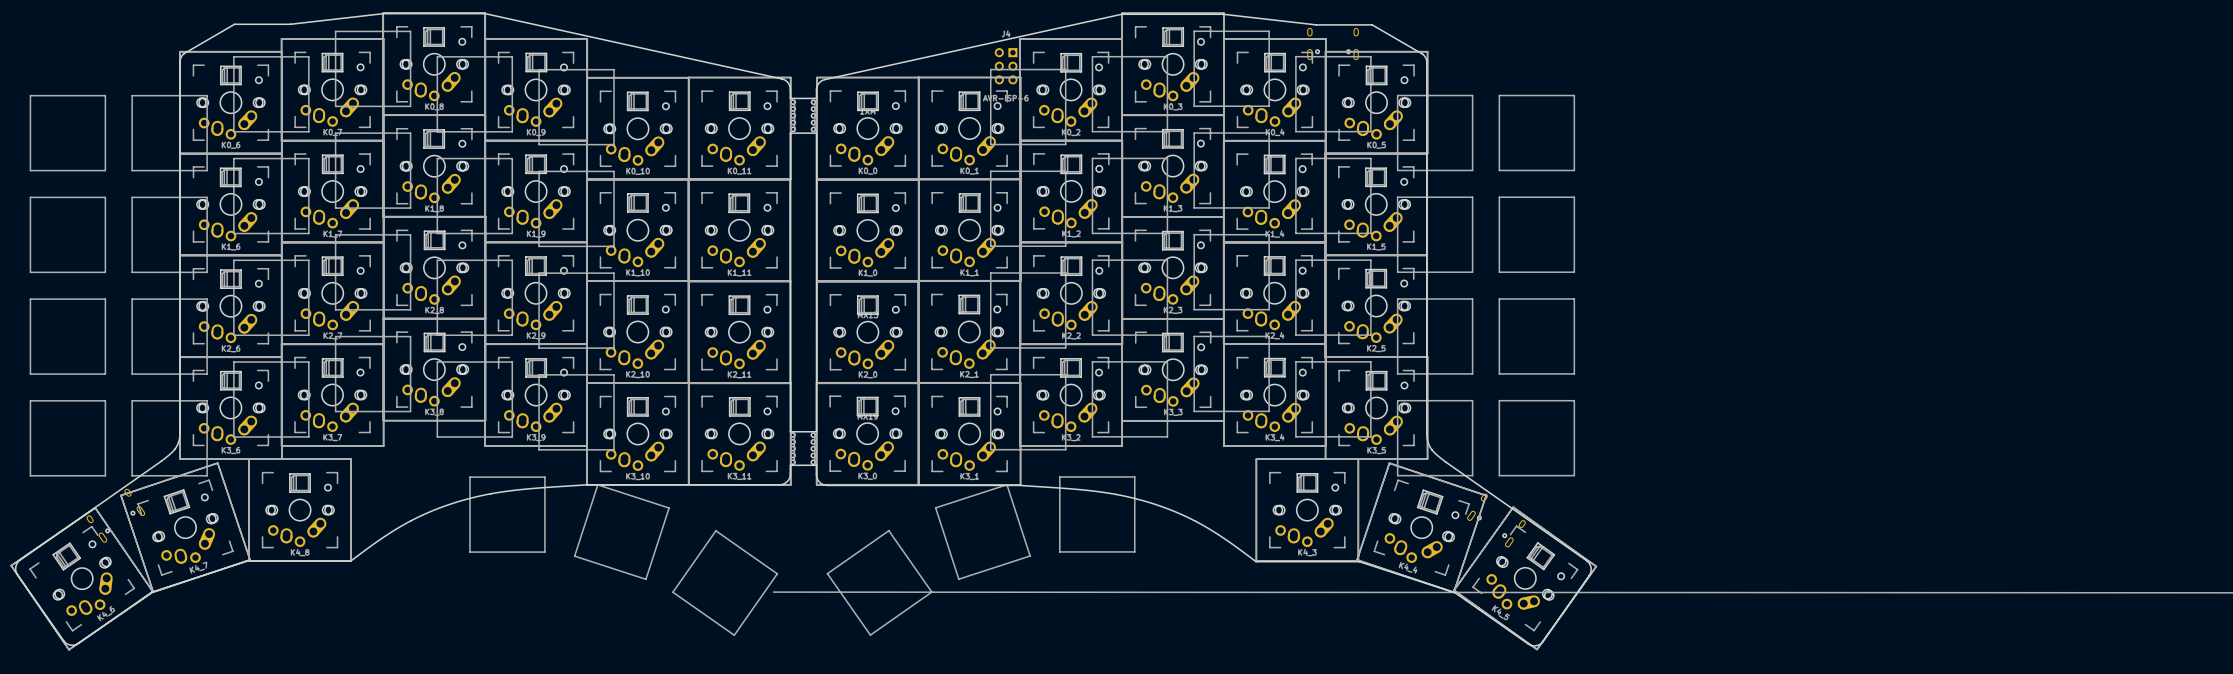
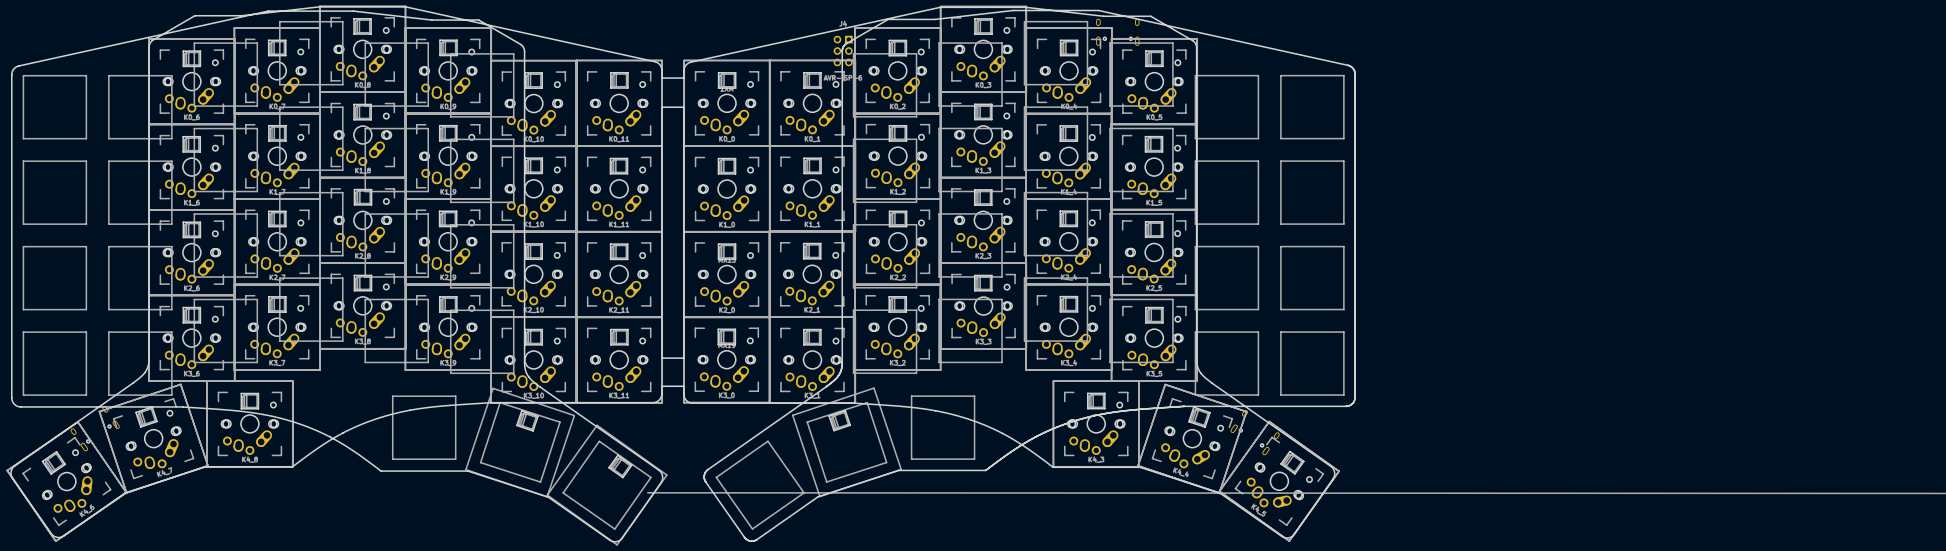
board edge: none -> (268, 11) (353, 11) (431, 20) (478, 20) (523, 46) (525, 368) (529, 377) (540, 387) (661, 472) (661, 482) (619, 540) (610, 540) (548, 497) (467, 471) (381, 471) (350, 448) (326, 435) (298, 423) (272, 416) (238, 411) (182, 406) (20, 406) (12, 402) (13, 69) (18, 65) (268, 11)
line: (1194, 31) (1194, 106) (1269, 106) (1269, 31) (1194, 31) -> (1024, 21) (1024, 84) (1087, 84) (1087, 21) (1024, 21)
line: (1092, 56) (1092, 131) (1167, 131) (1167, 56) (1092, 56) -> (939, 43) (939, 106) (1001, 106) (1001, 43) (939, 43)
line: (1295, 56) (1295, 131) (1370, 131) (1370, 56) (1295, 56) -> (1109, 43) (1109, 106) (1172, 106) (1172, 43) (1109, 43)
board edge: none -> (845, 44) (888, 19) (935, 19) (1013, 10) (1098, 10) (1348, 65)
board edge: none -> (845, 44) (842, 51)
board edge: none -> (845, 44) (842, 51)
board edge: none -> (842, 51) (842, 362)
line: (990, 69) (990, 144) (1065, 144) (1065, 69) (990, 69) -> (853, 53) (853, 116) (916, 116) (916, 53) (853, 53)
board edge: none -> (1348, 65) (1353, 68) (1355, 74)
board edge: none -> (1348, 65) (1353, 68) (1355, 74)
board edge: none -> (1355, 74) (1355, 397)
line: (1397, 95) (1472, 95) (1472, 170) (1397, 170) (1397, 95) -> (1195, 75) (1258, 75) (1258, 138) (1195, 138) (1195, 75)
line: (1499, 95) (1499, 170) (1574, 170) (1574, 95) (1499, 95) -> (1280, 75) (1280, 138) (1343, 138) (1343, 75) (1280, 75)
part: (793, 115) -> none
part: (813, 115) -> none
line: (1194, 133) (1194, 207) (1269, 207) (1269, 133) (1194, 133) -> (1024, 107) (1024, 170) (1087, 170) (1087, 107) (1024, 107)
line: (1092, 158) (1092, 233) (1167, 233) (1167, 158) (1092, 158) -> (939, 128) (939, 191) (1001, 191) (1001, 128) (939, 128)
line: (1295, 158) (1295, 233) (1370, 233) (1370, 158) (1295, 158) -> (1109, 128) (1109, 191) (1172, 191) (1172, 128) (1109, 128)
line: (990, 171) (990, 246) (1065, 246) (1065, 171) (990, 171) -> (853, 139) (853, 202) (916, 202) (916, 139) (853, 139)
line: (1397, 197) (1472, 197) (1472, 272) (1397, 272) (1397, 197) -> (1195, 161) (1258, 161) (1258, 224) (1195, 224) (1195, 161)
line: (1499, 197) (1499, 272) (1574, 272) (1574, 197) (1499, 197) -> (1280, 161) (1280, 224) (1343, 224) (1343, 161) (1280, 161)
line: (1194, 234) (1194, 309) (1269, 309) (1269, 234) (1194, 234) -> (1024, 192) (1024, 255) (1087, 255) (1087, 192) (1024, 192)
line: (1092, 260) (1092, 335) (1167, 335) (1167, 260) (1092, 260) -> (939, 213) (939, 276) (1001, 276) (1001, 213) (939, 213)
line: (1295, 260) (1295, 335) (1370, 335) (1370, 260) (1295, 260) -> (1109, 213) (1109, 276) (1172, 276) (1172, 213) (1109, 213)
line: (990, 273) (990, 347) (1065, 347) (1065, 273) (990, 273) -> (853, 224) (853, 287) (916, 287) (916, 224) (853, 224)
line: (1397, 298) (1472, 298) (1472, 373) (1397, 373) (1397, 298) -> (1195, 246) (1258, 246) (1258, 309) (1195, 309) (1195, 246)
line: (1499, 298) (1499, 373) (1574, 373) (1574, 298) (1499, 298) -> (1280, 246) (1280, 309) (1343, 309) (1343, 246) (1280, 246)
line: (1194, 336) (1269, 336) (1269, 411) (1194, 411) (1194, 336) -> (1024, 278) (1087, 278) (1087, 341) (1024, 341) (1024, 278)
line: (1092, 361) (1092, 436) (1167, 436) (1167, 361) (1092, 361) -> (939, 299) (939, 362) (1001, 362) (1001, 299) (939, 299)
line: (1295, 361) (1295, 436) (1370, 436) (1370, 361) (1295, 361) -> (1109, 299) (1109, 362) (1172, 362) (1172, 299) (1109, 299)
line: (990, 374) (990, 449) (1065, 449) (1065, 374) (990, 374) -> (853, 310) (853, 373) (916, 373) (916, 310) (853, 310)
line: (1397, 400) (1397, 475) (1472, 475) (1472, 400) (1397, 400) -> (1195, 332) (1195, 395) (1258, 395) (1258, 332) (1195, 332)
line: (1499, 400) (1499, 475) (1574, 475) (1574, 400) (1499, 400) -> (1280, 332) (1280, 395) (1343, 395) (1343, 332) (1280, 332)
board edge: none -> (842, 362) (838, 376)
board edge: none -> (842, 362) (838, 376)
part: (793, 448) -> none
part: (813, 448) -> none
board edge: none -> (838, 376) (826, 386)
board edge: none -> (838, 376) (826, 386)
board edge: none -> (826, 386) (708, 469)
line: (1059, 476) (1059, 551) (1134, 551) (1134, 476) (1059, 476) -> (911, 396) (911, 459) (974, 459) (974, 396) (911, 396)
board edge: none -> (1355, 397) (1352, 403) (1346, 406)
board edge: none -> (1355, 397) (1352, 403) (1346, 406)
line: (1006, 484) (935, 507) (958, 579) (1030, 556) (1006, 484) -> (867, 402) (807, 422) (826, 482) (886, 462) (867, 402)
board edge: none -> (1184, 406) (1346, 406)
board edge: none -> (1184, 406) (1103, 413)
board edge: none -> (1184, 406) (1103, 413)
board edge: none -> (1103, 413) (1068, 422) (1036, 436)
board edge: none -> (1103, 413) (1068, 422) (1036, 436)
board edge: none -> (1036, 436) (985, 470)
board edge: none -> (1036, 436) (985, 470)
line: (888, 530) (827, 573) (870, 635) (931, 592) (888, 530) -> (767, 441) (716, 477) (752, 528) (804, 492) (767, 441)
part: none -> (520, 442)
part: none -> (846, 442)
board edge: none -> (708, 469) (704, 475) (705, 482)
board edge: none -> (708, 469) (704, 475) (705, 482)
board edge: none -> (985, 470) (898, 470) (818, 496) (757, 539)
board edge: none -> (705, 482) (744, 537)
part: none -> (607, 485)
board edge: none -> (744, 537) (750, 541) (757, 539)
board edge: none -> (744, 537) (750, 541) (757, 539)

